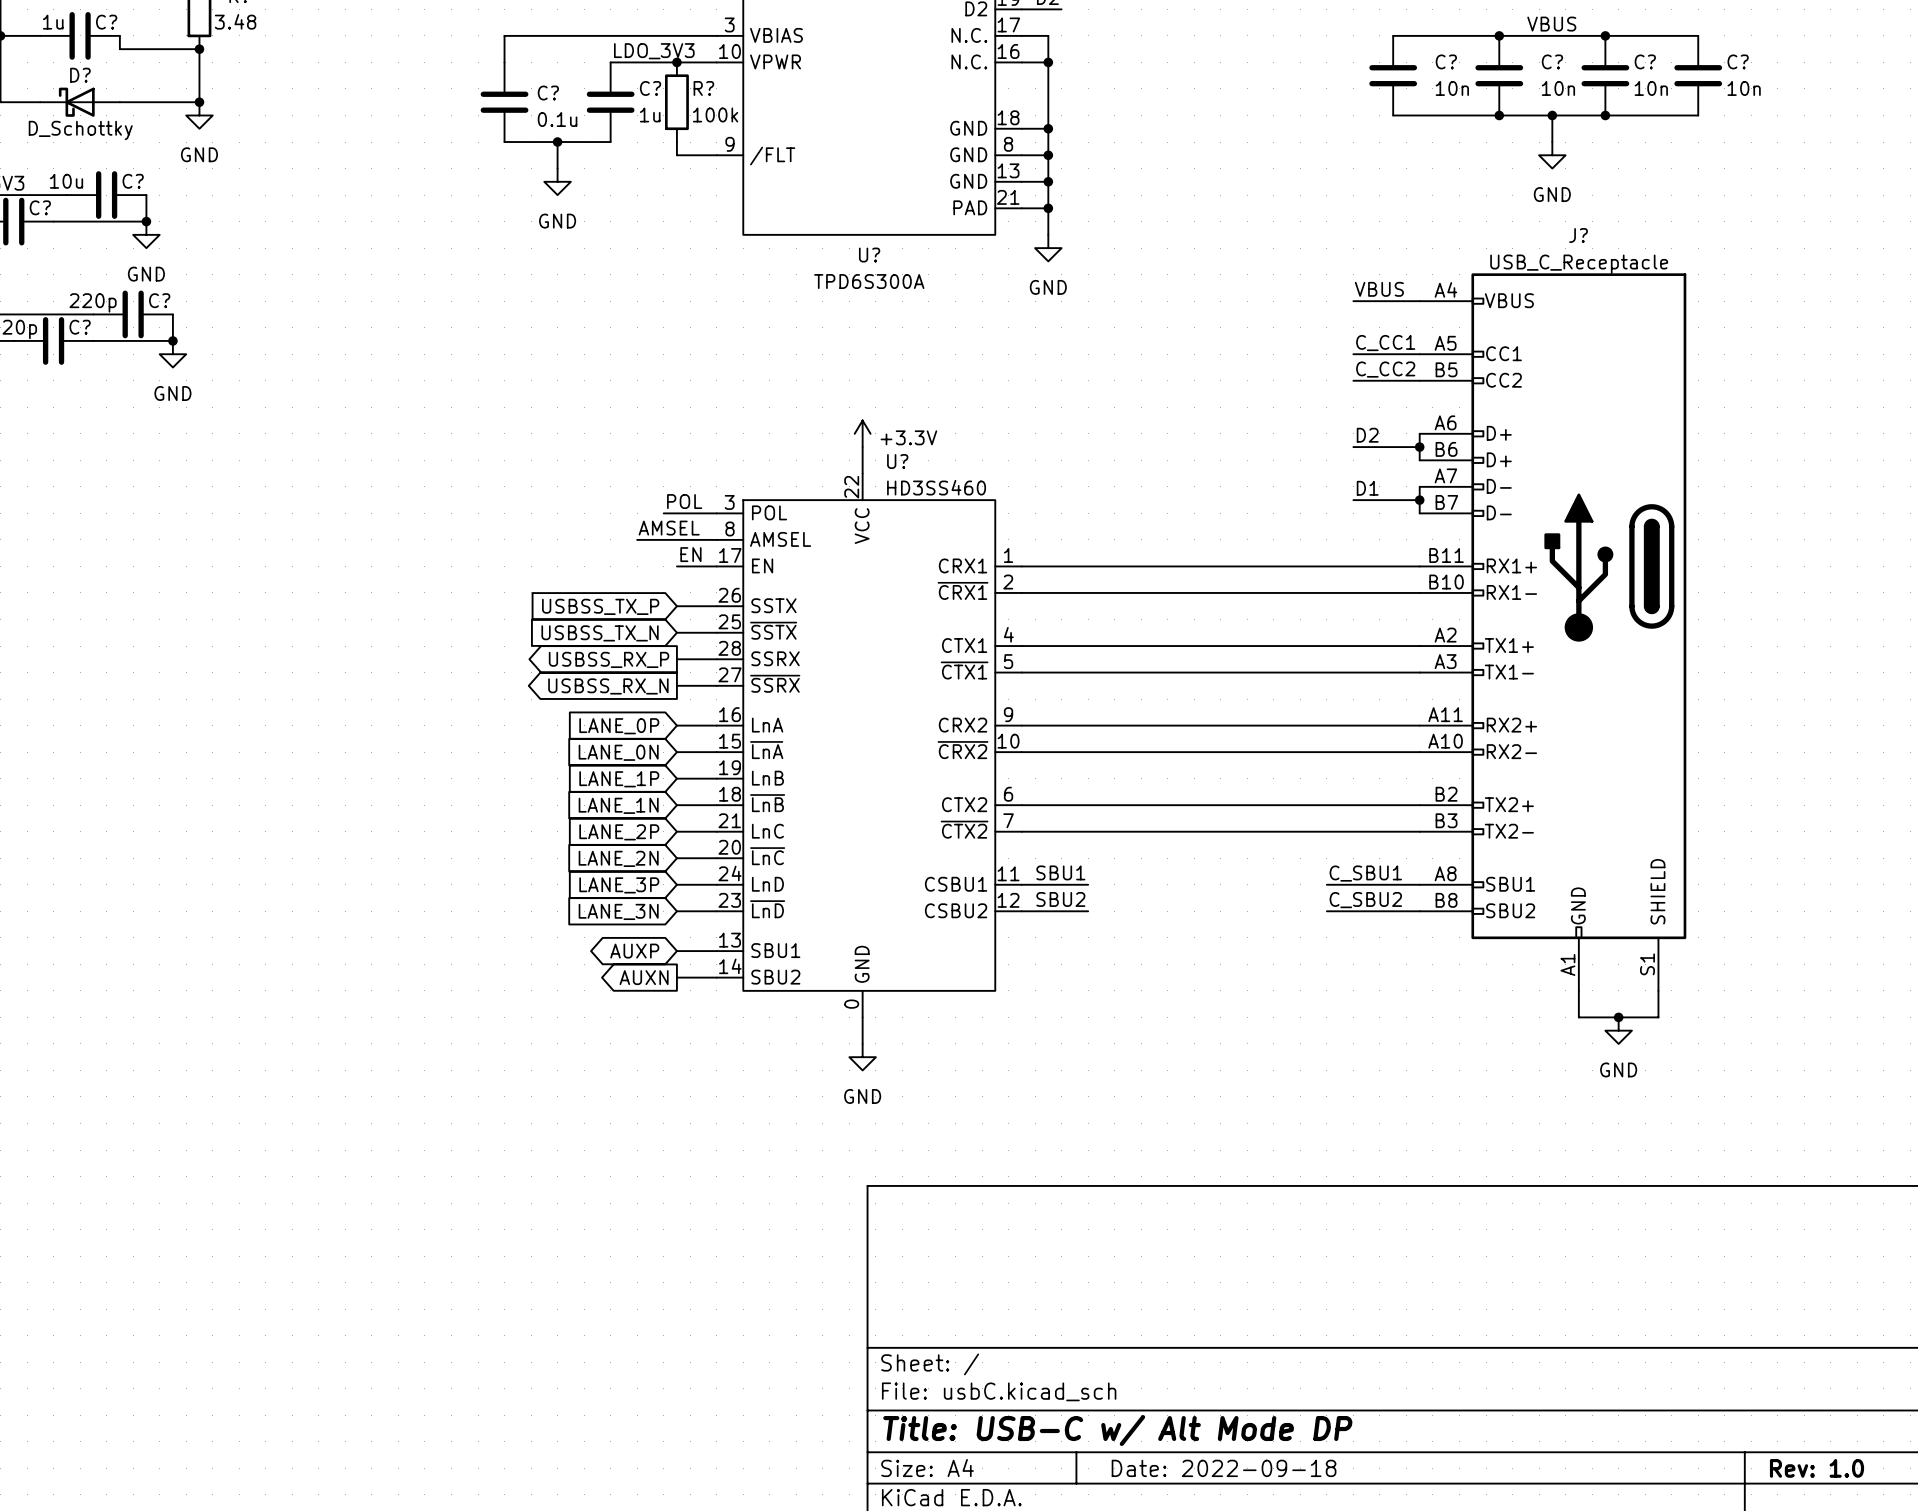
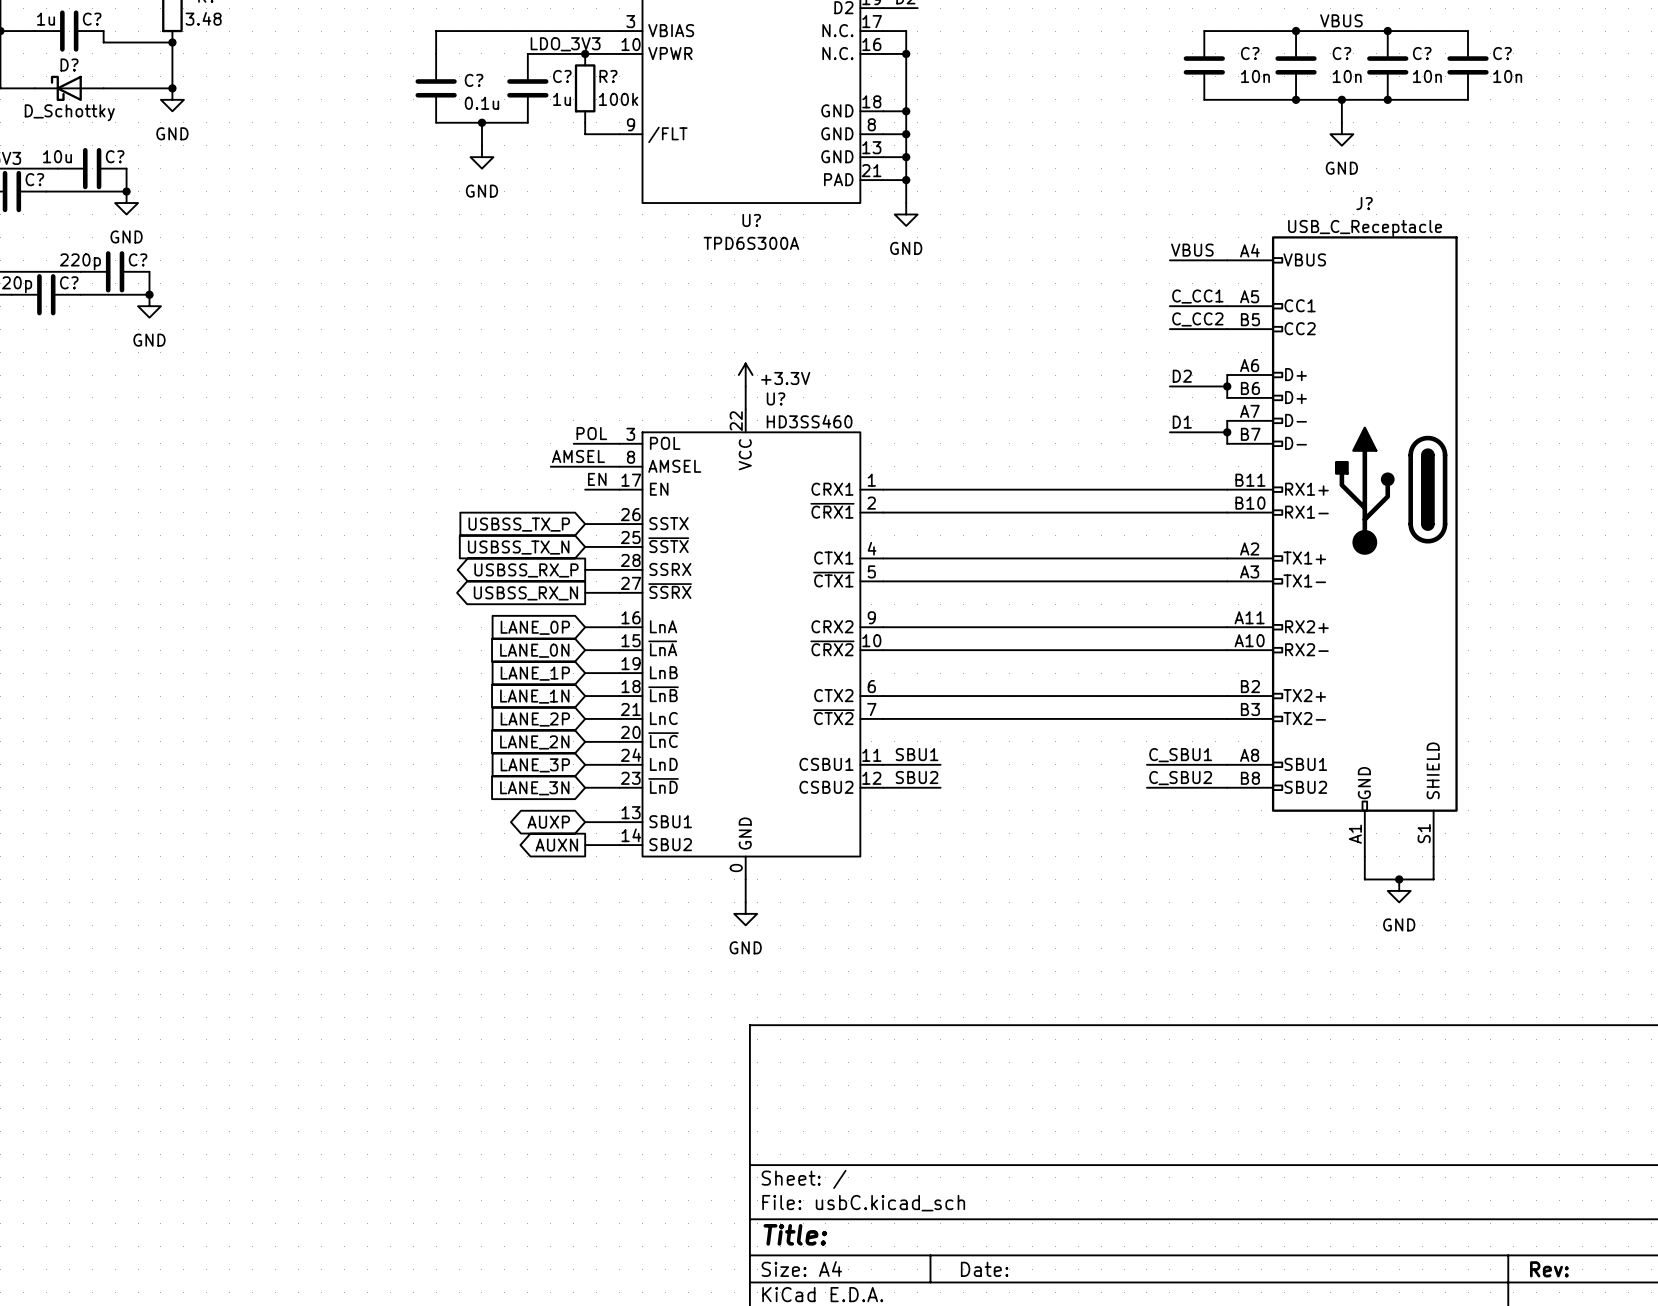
title block: Title: USB-C w/ Alt Mode DP (1117, 1430) -> Title: (795, 1234)
title block: Date: 2022-09-18 (1224, 1468) -> Date: (984, 1269)
title block: Rev: 1.0 (1816, 1468) -> Rev: (1549, 1269)

